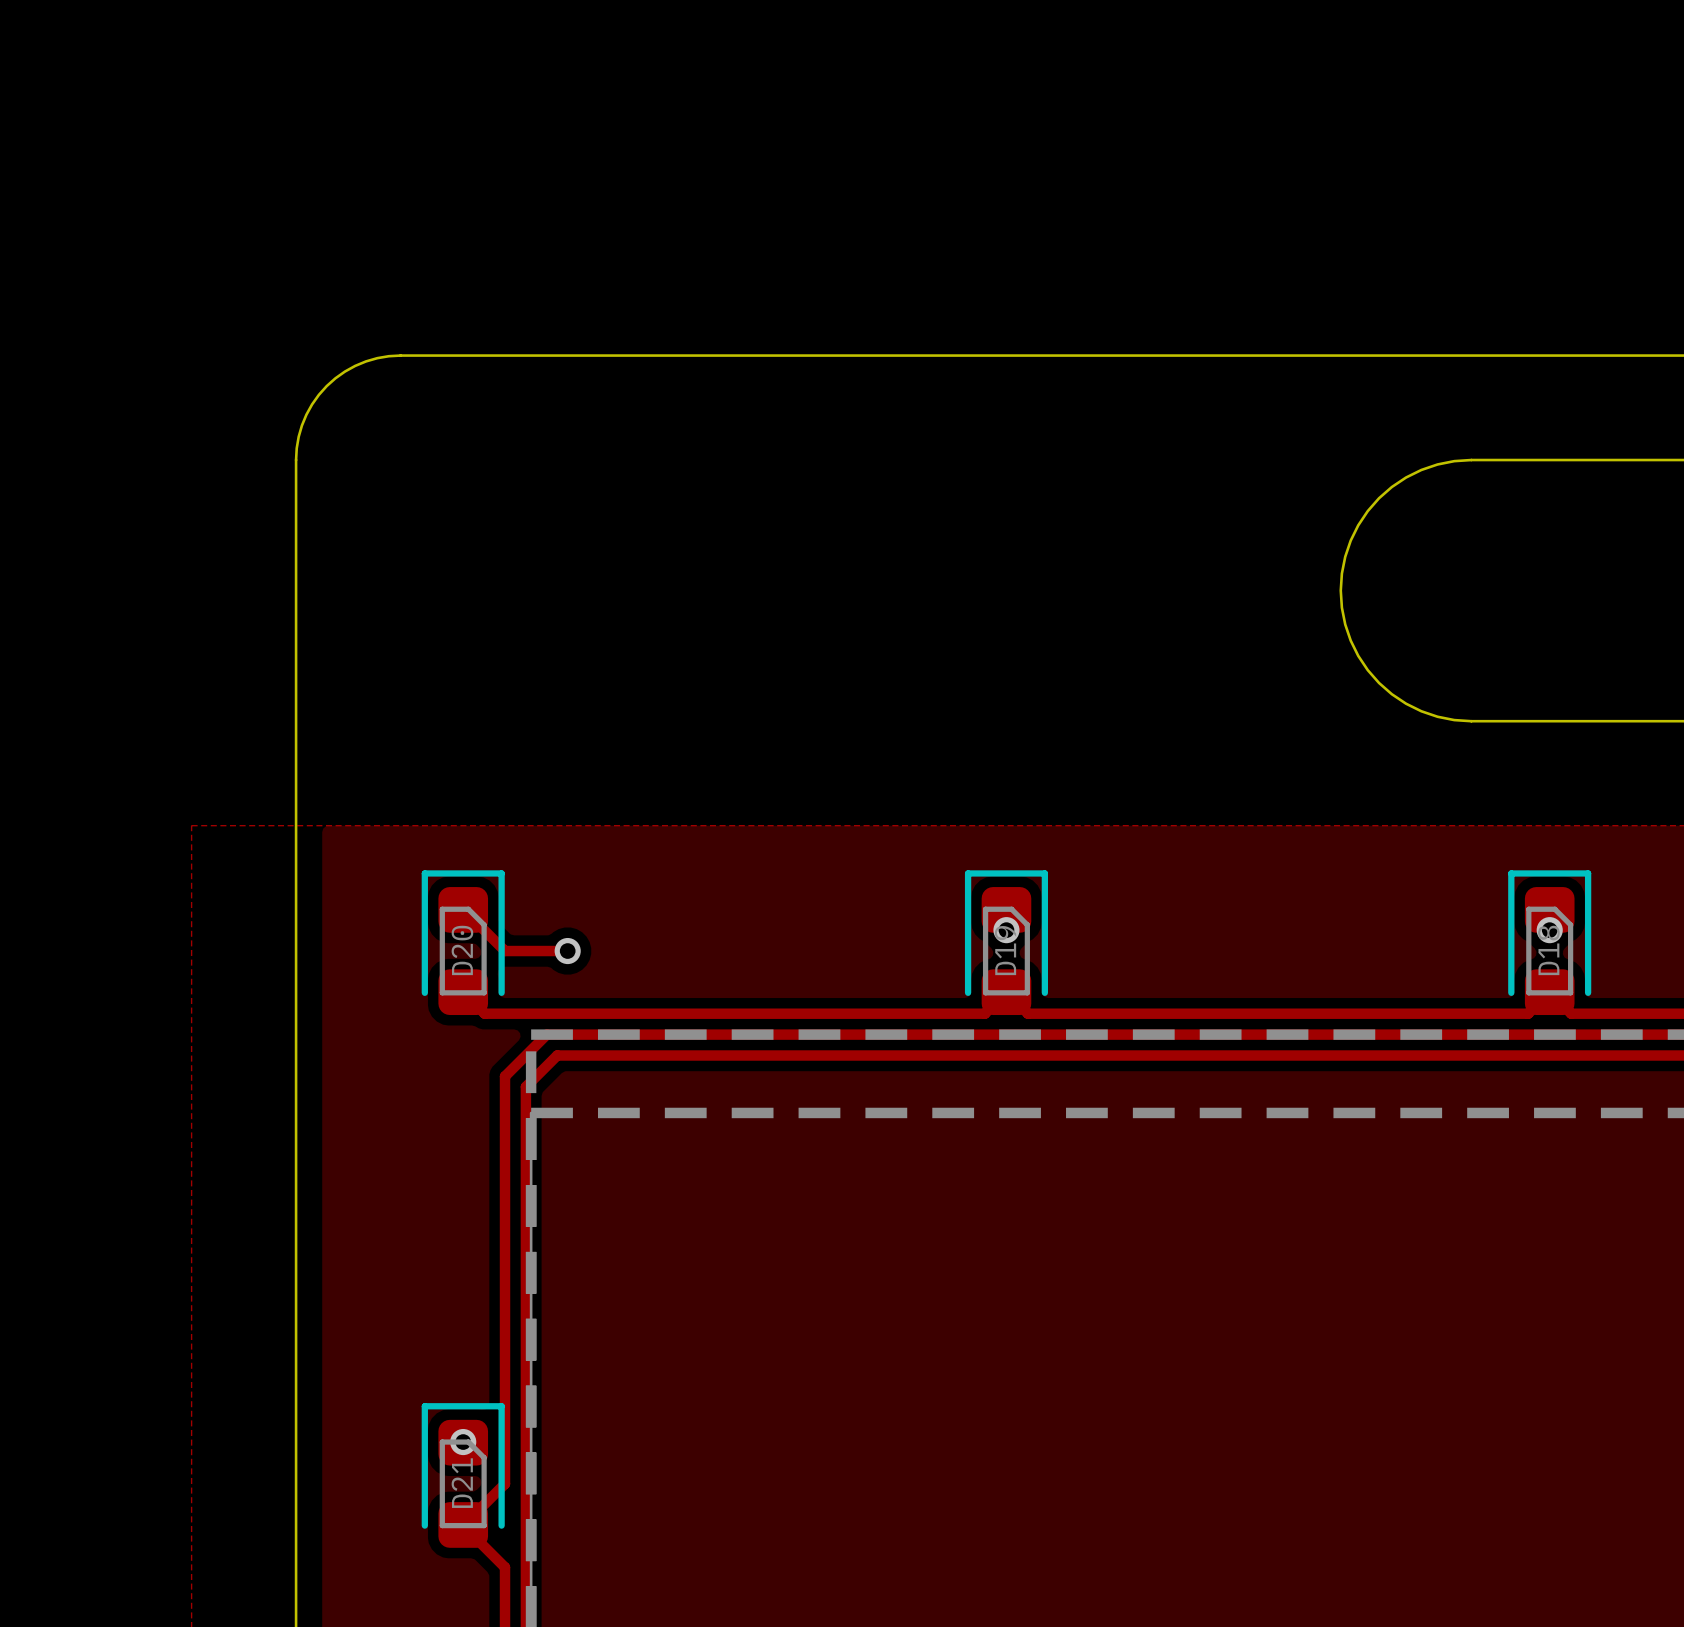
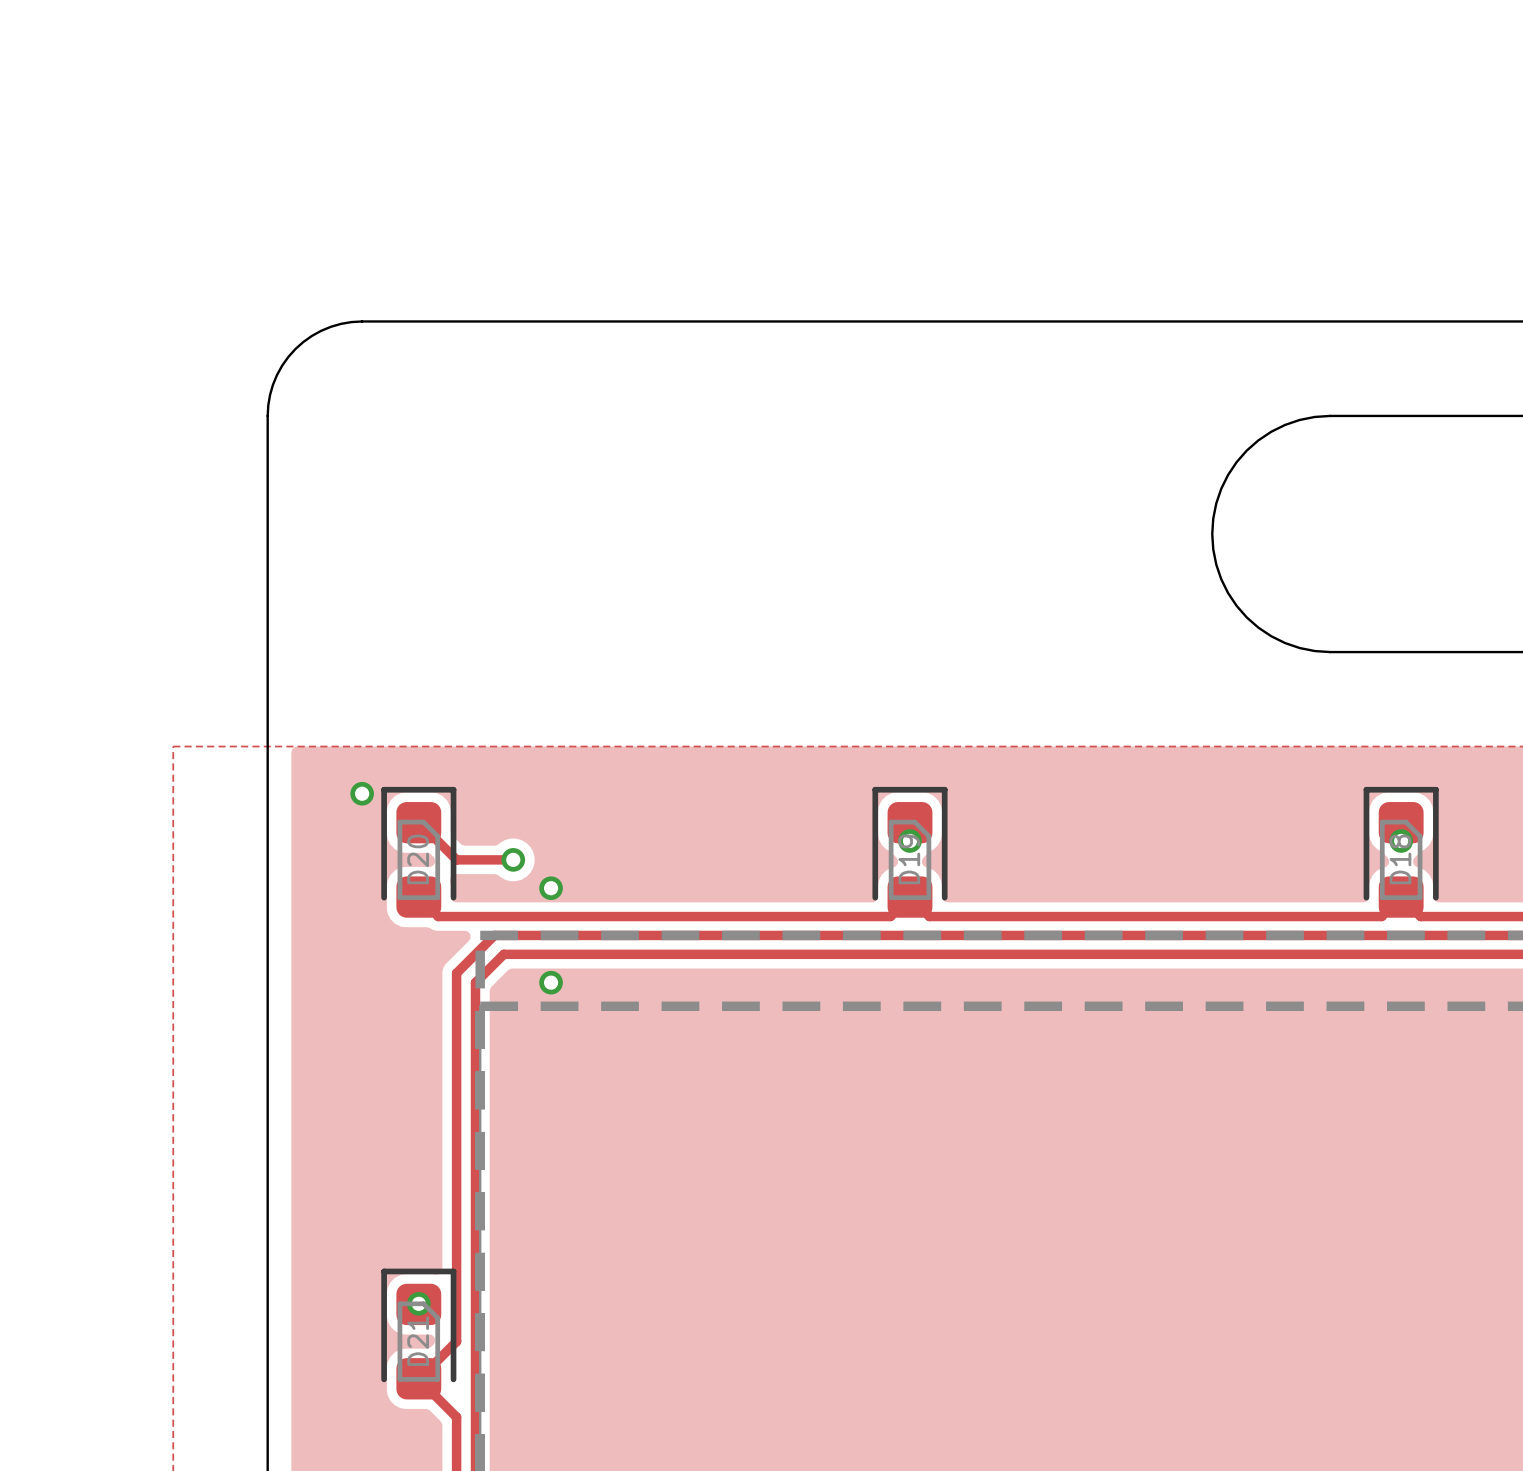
via: none -> (362, 793)
via: none -> (551, 888)
via: none -> (551, 982)

